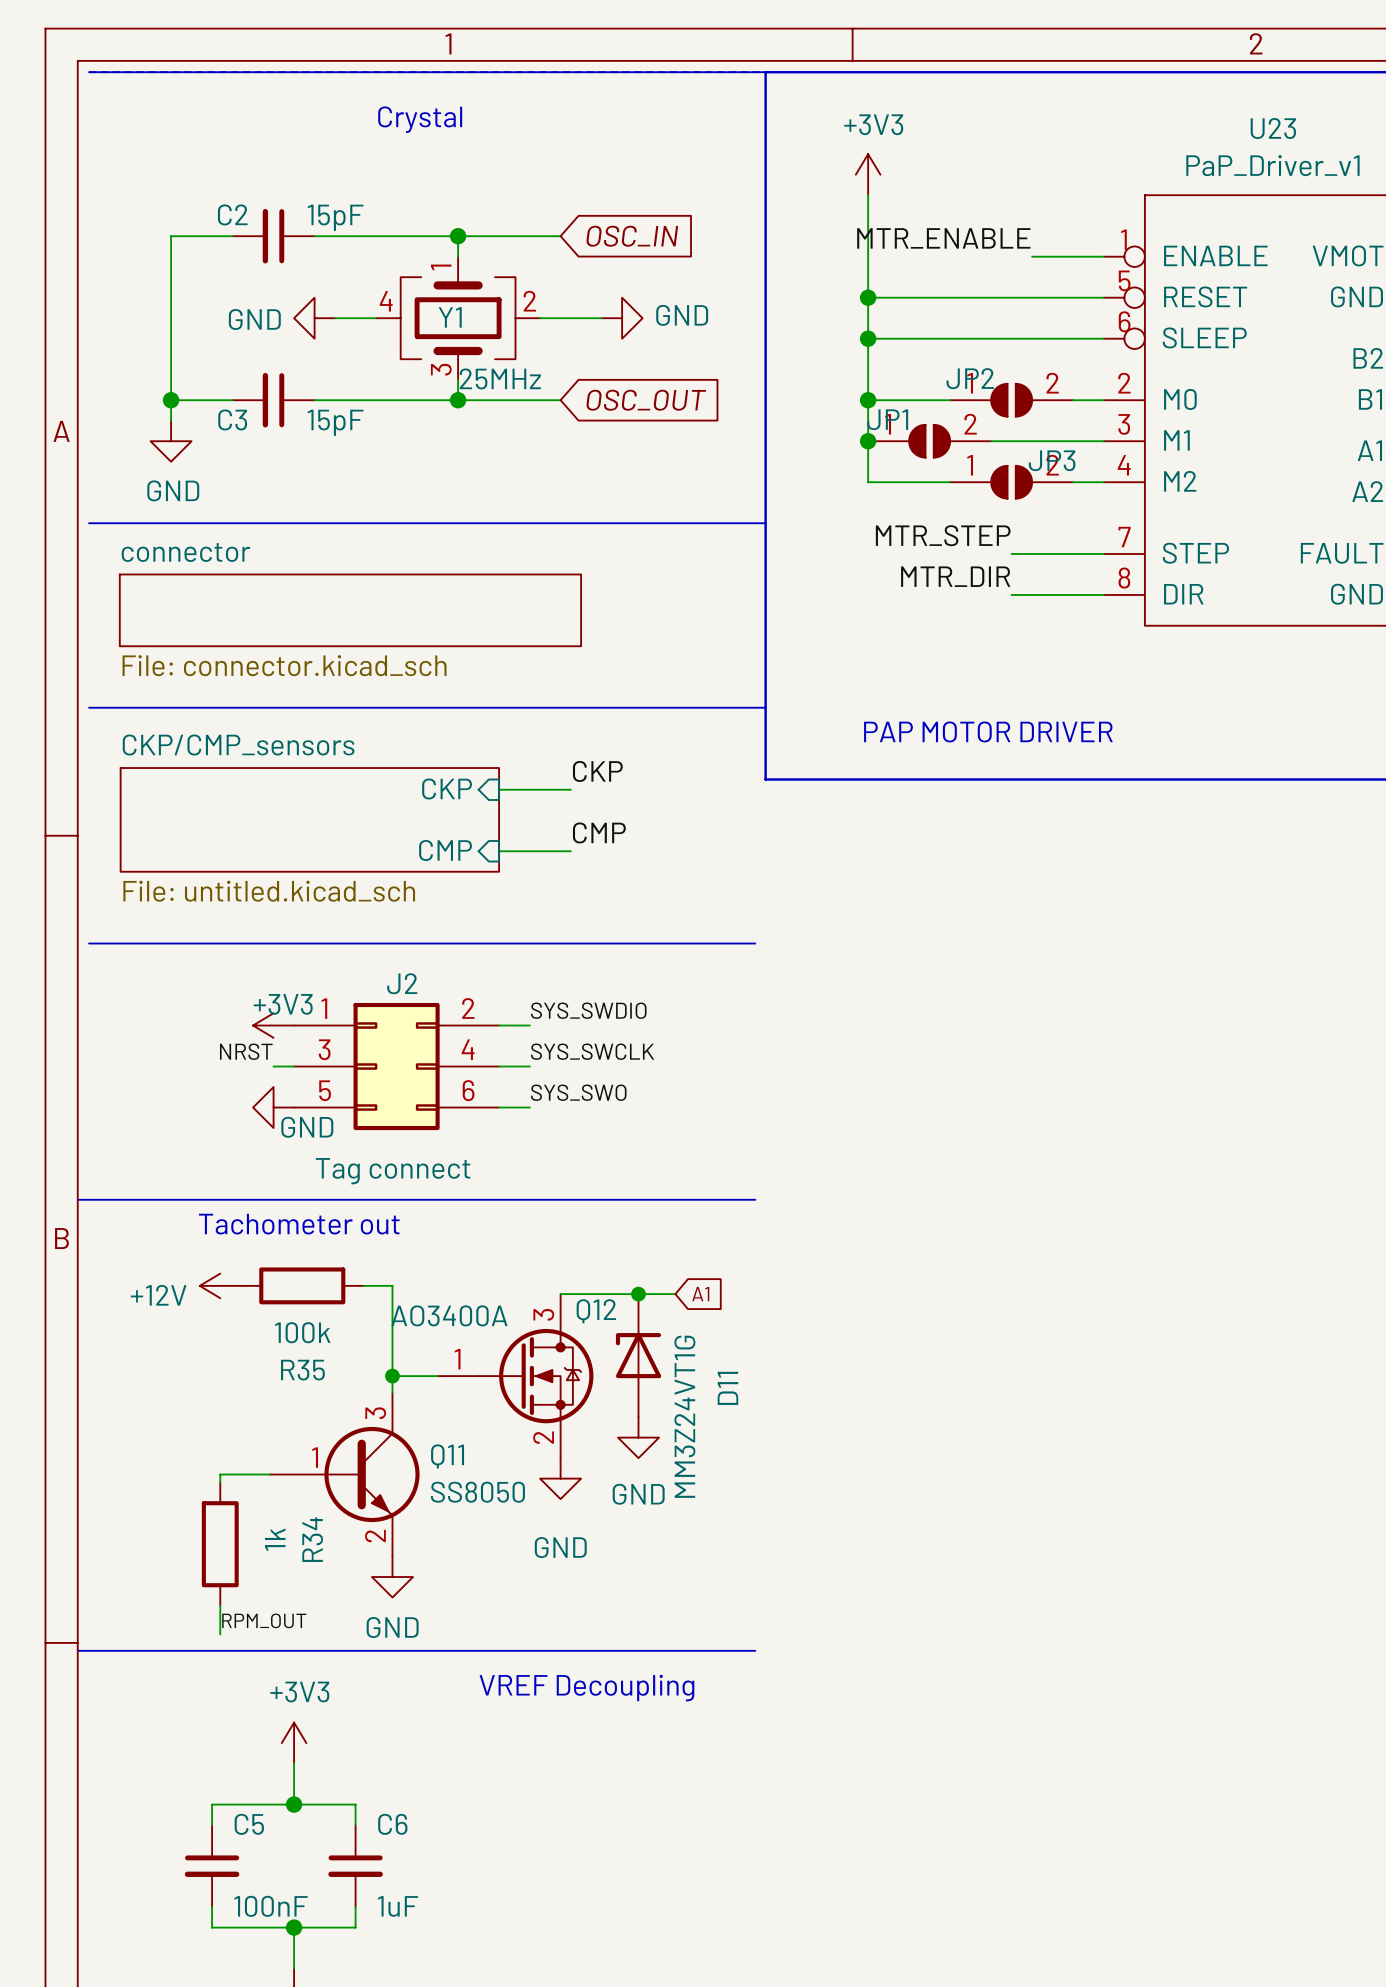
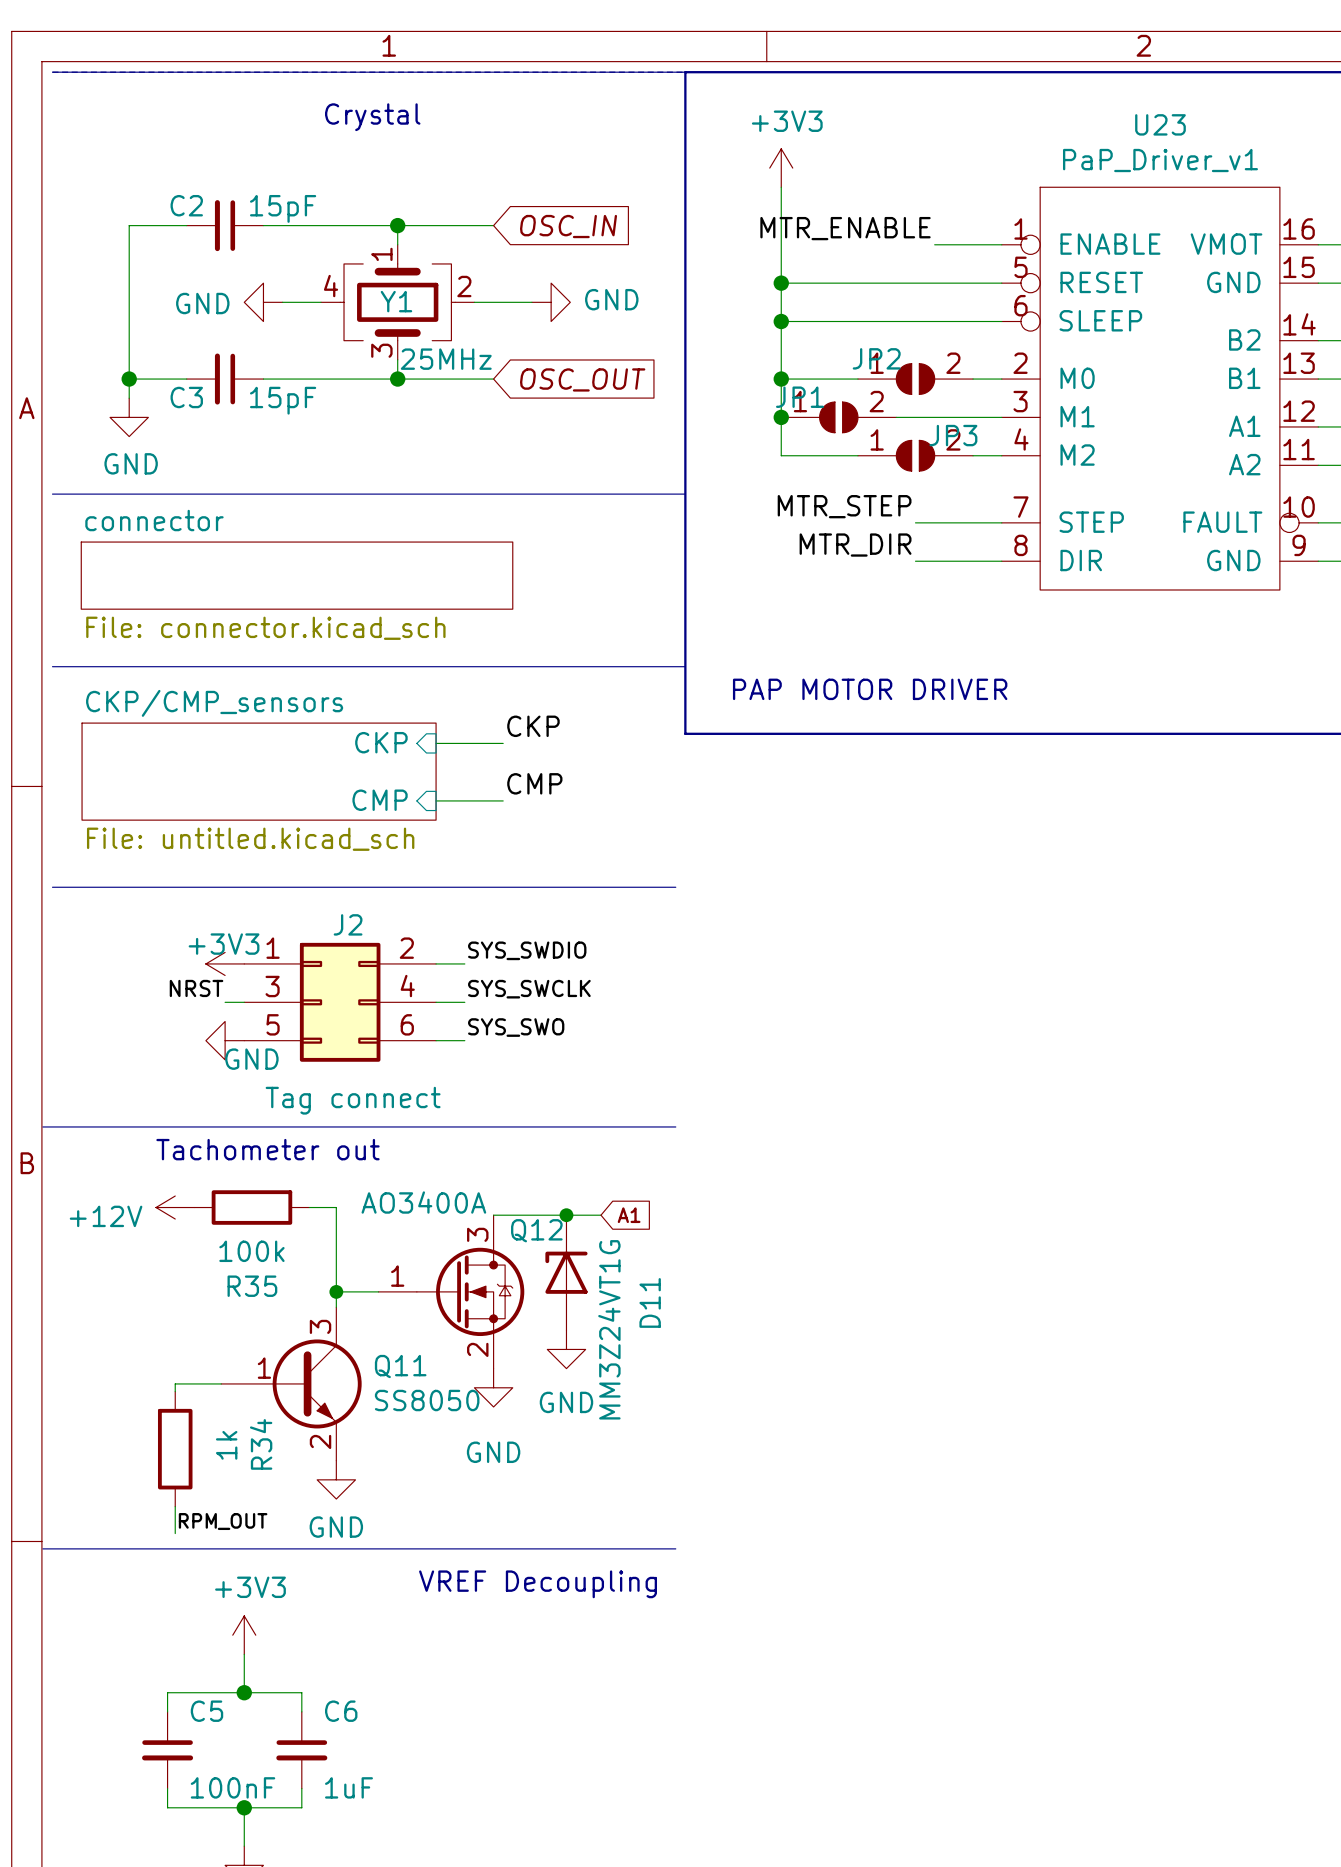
Q12 value position: AO3400A (449, 1315) -> AO3400A (423, 1202)

